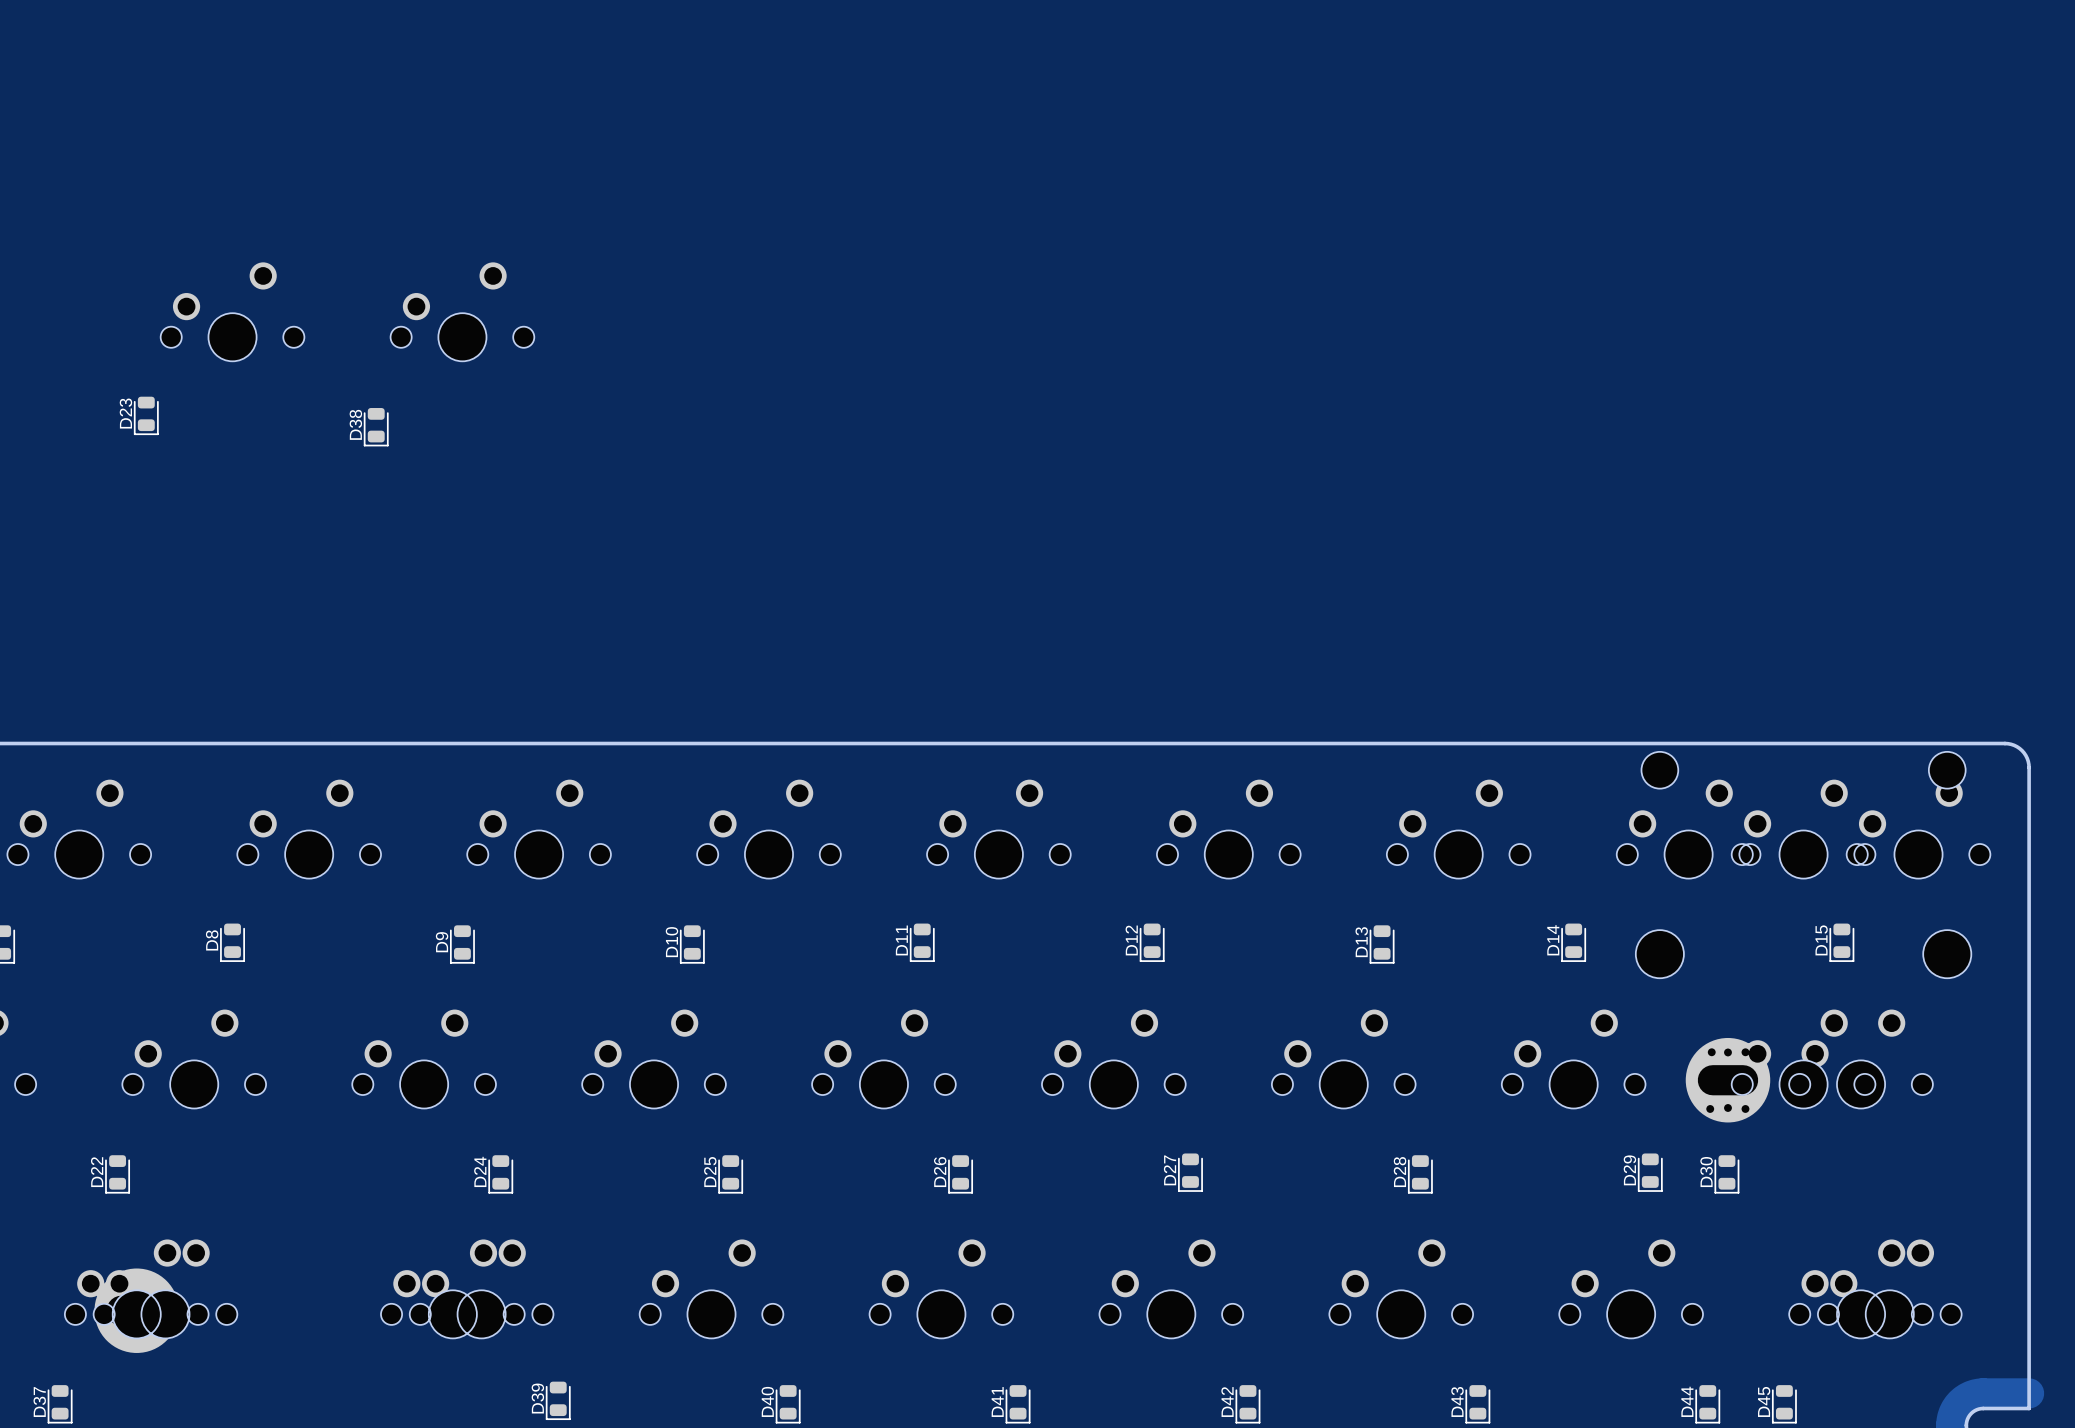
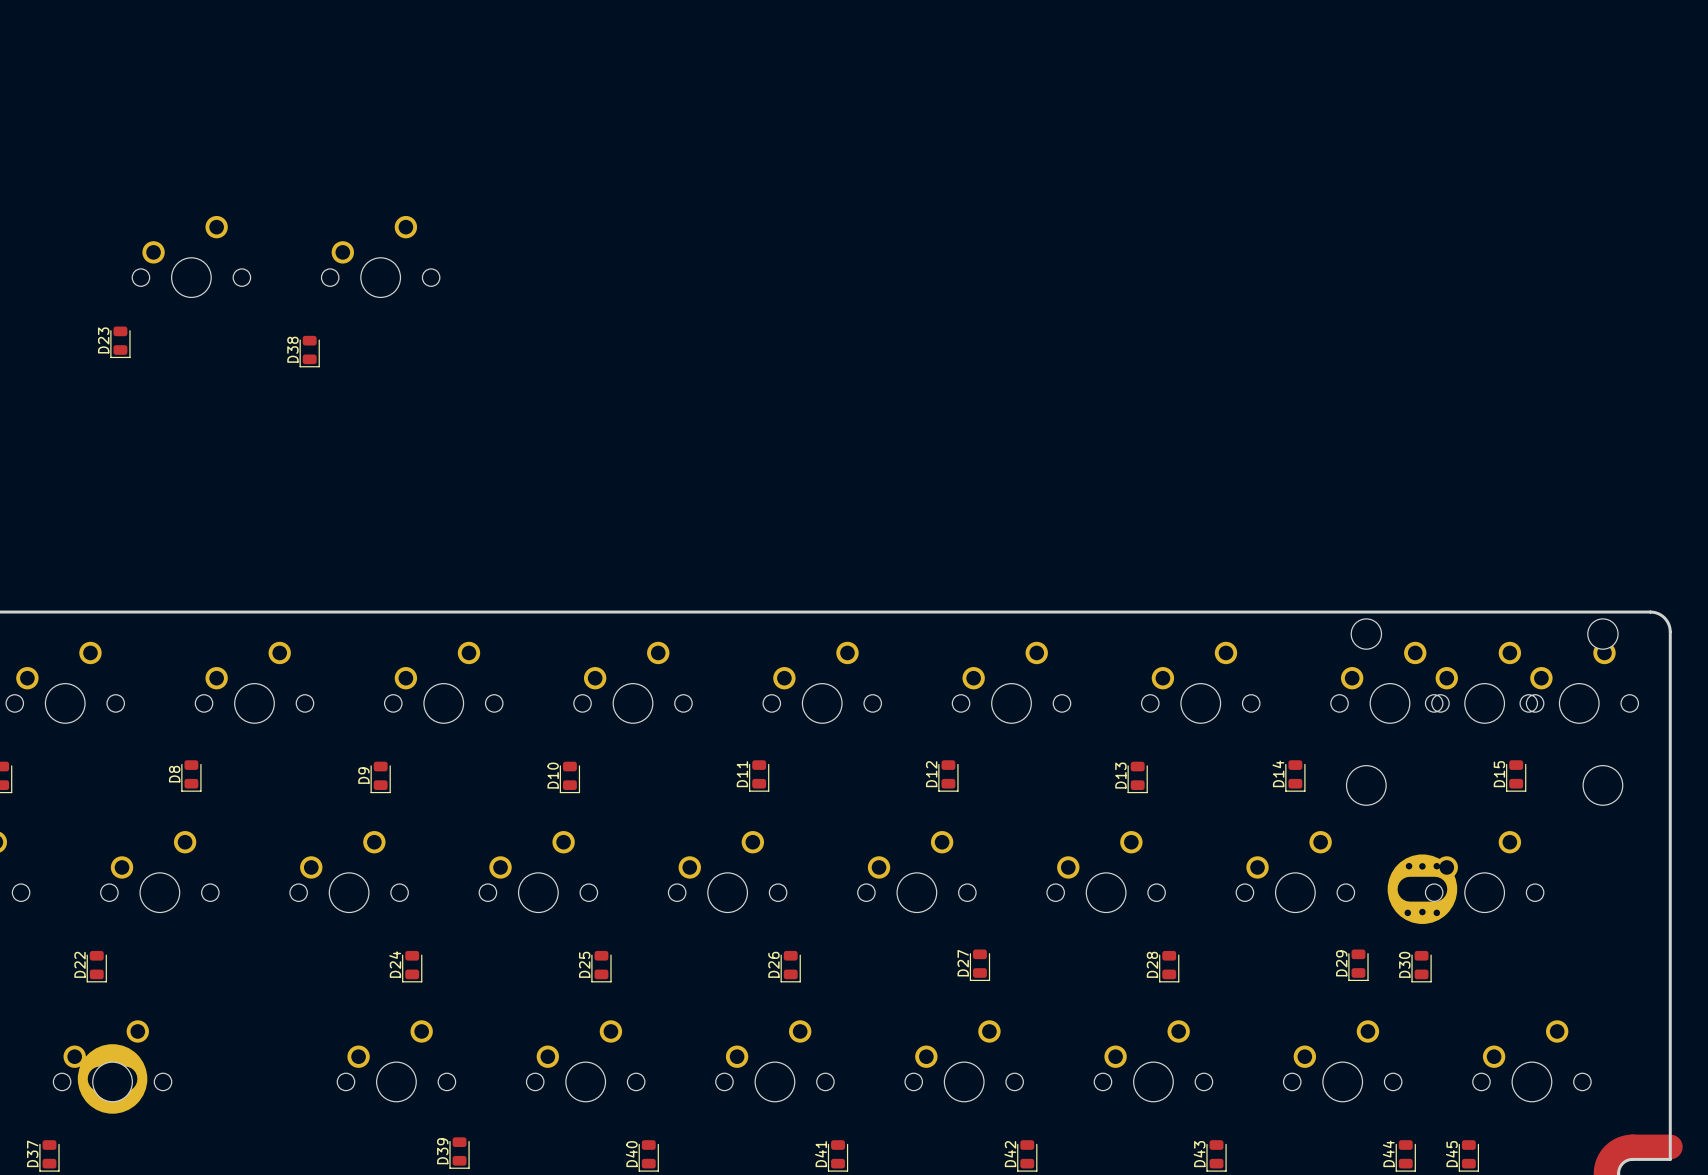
part: (1861, 1059) -> none
part: (165, 1288) -> none
part: (452, 1288) -> none
part: (1889, 1288) -> none

